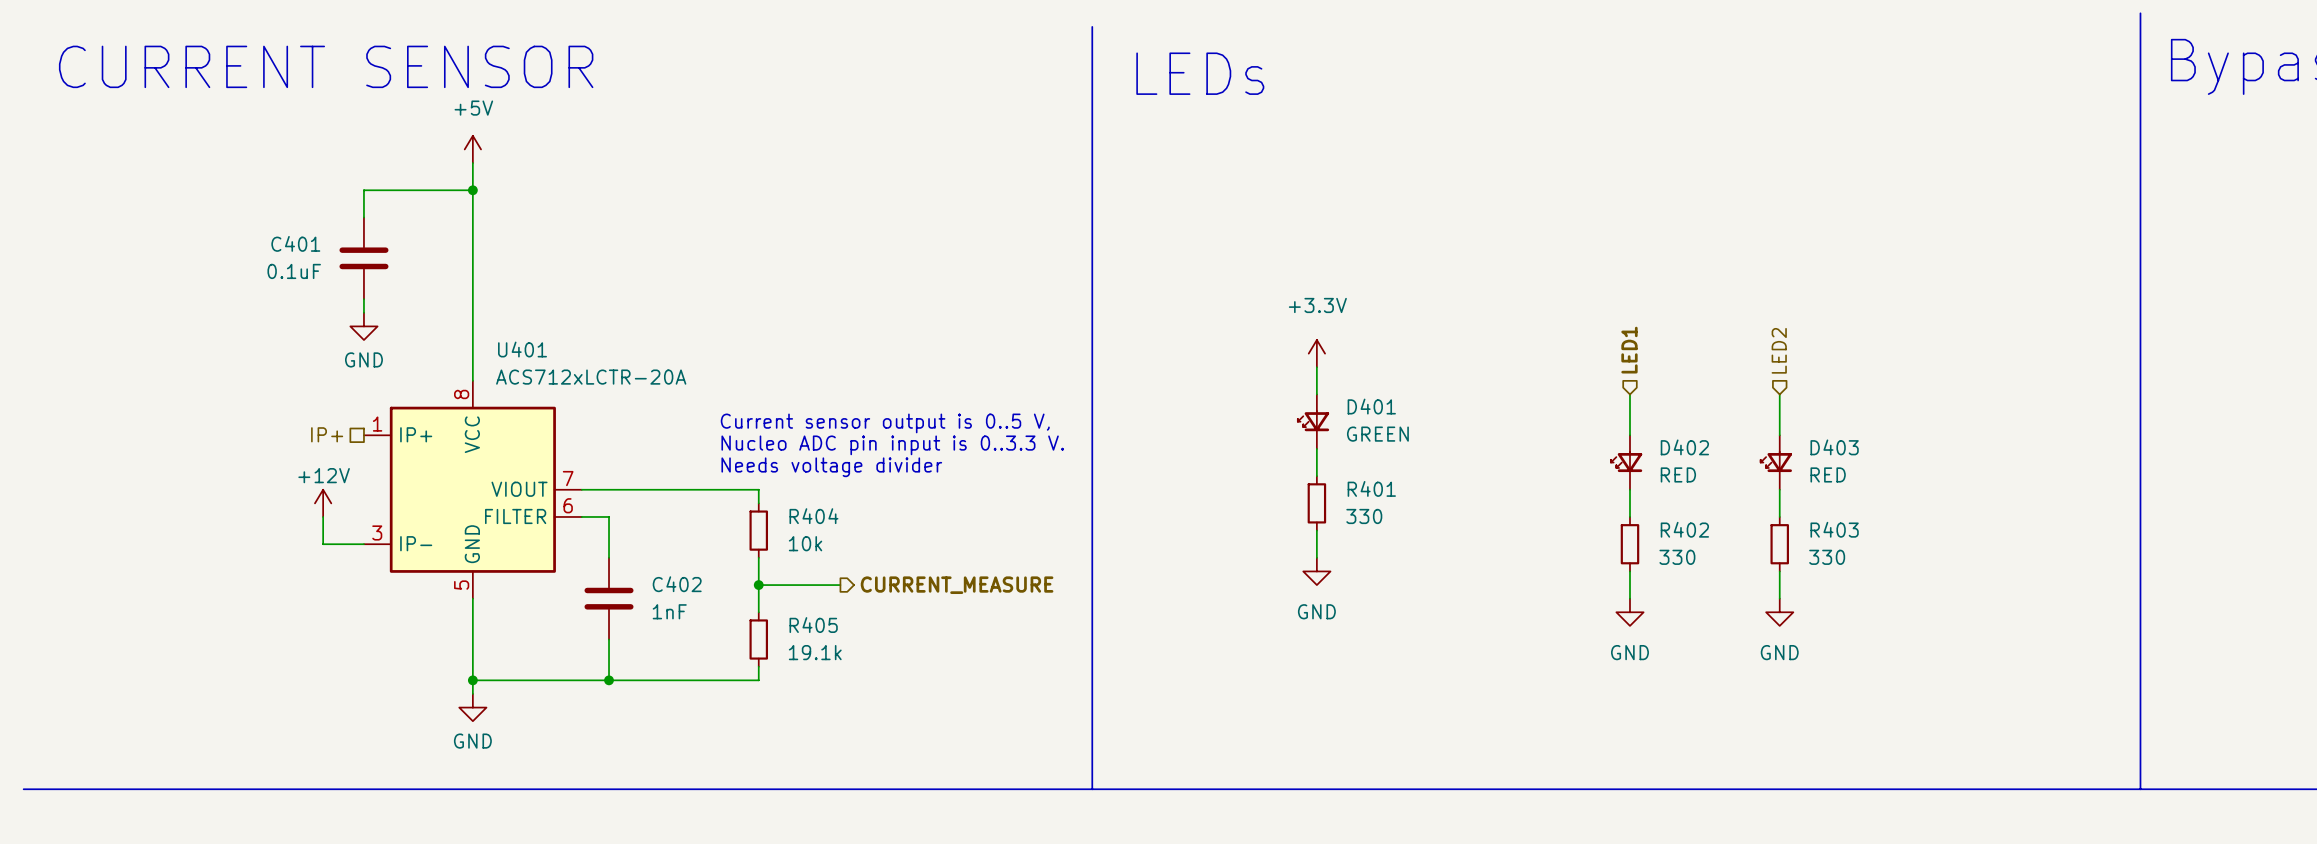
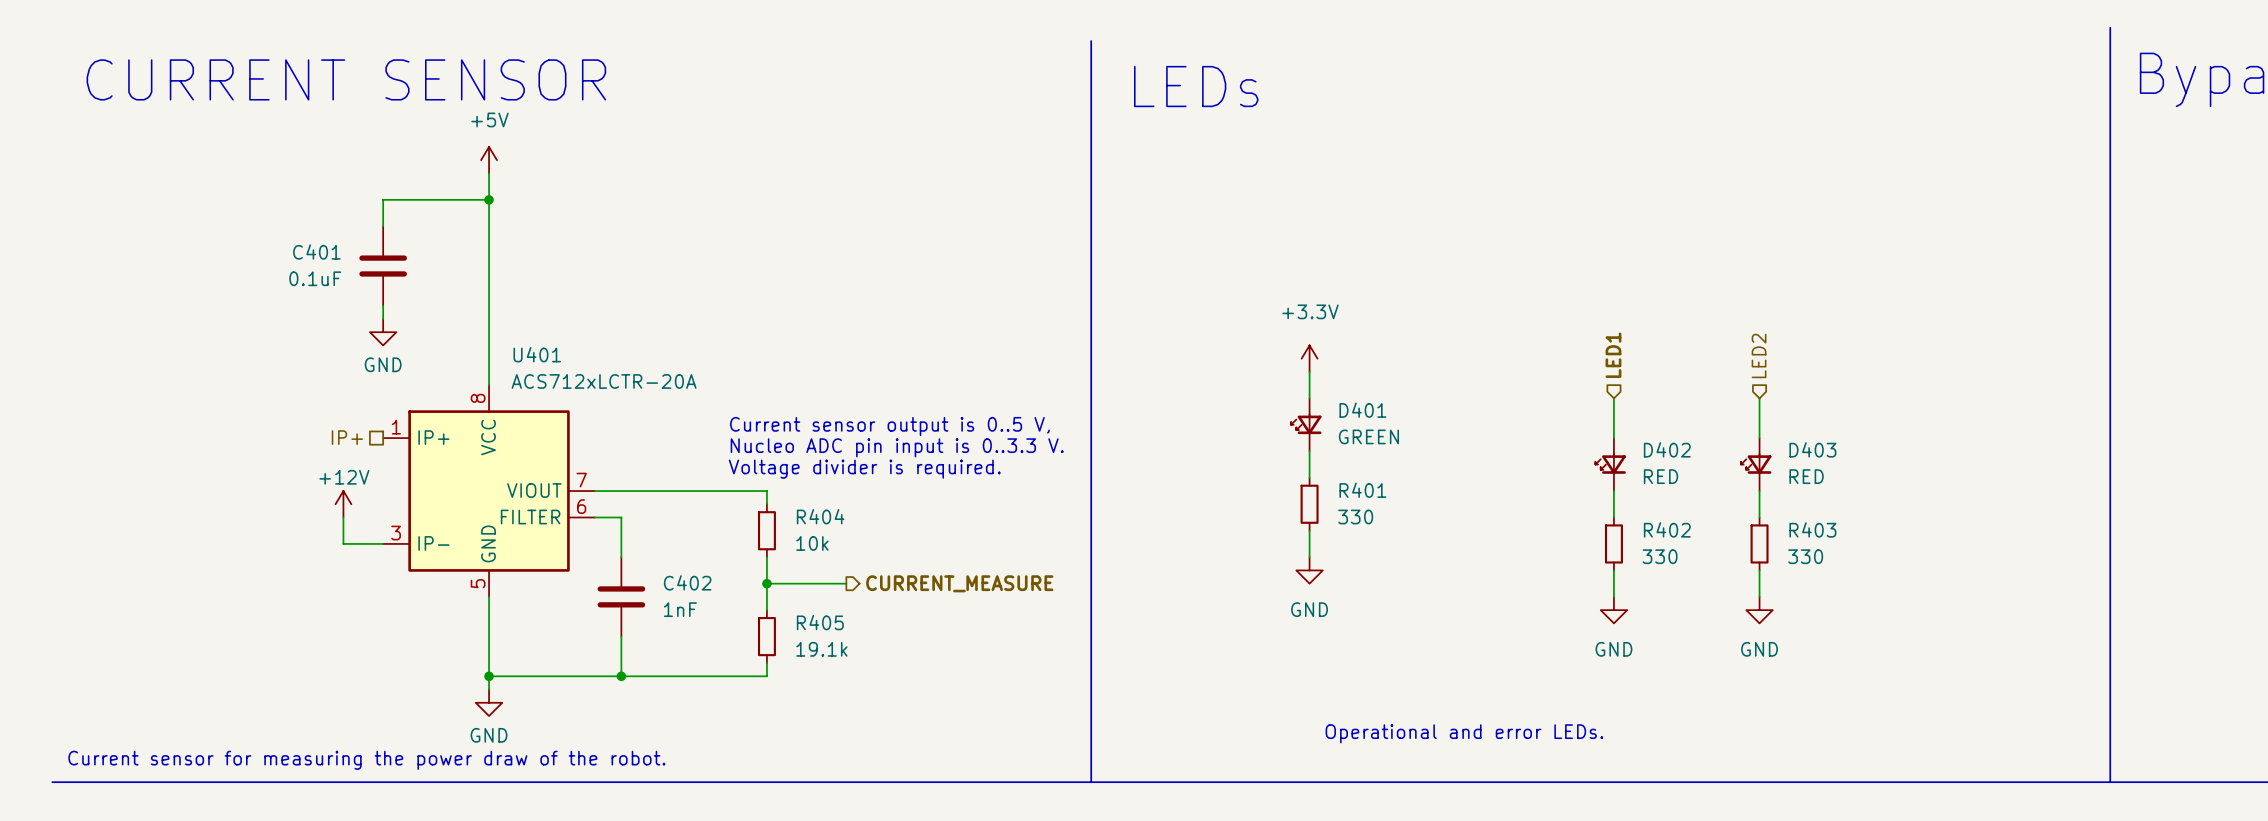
text: Needs voltage divider (831, 467) -> Voltage divider is required. (864, 469)
text: none -> Operational and error LEDs. (1464, 733)
text: none -> Current sensor for measuring the power draw of the robot. (366, 760)

